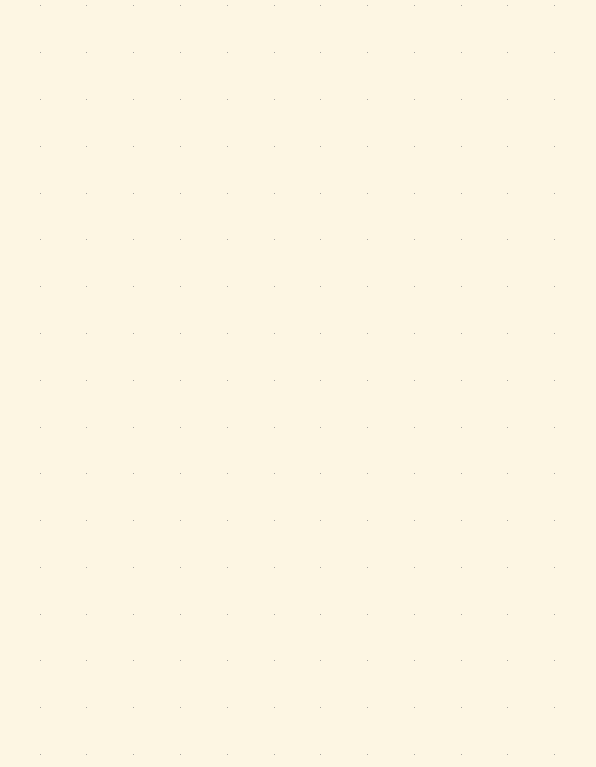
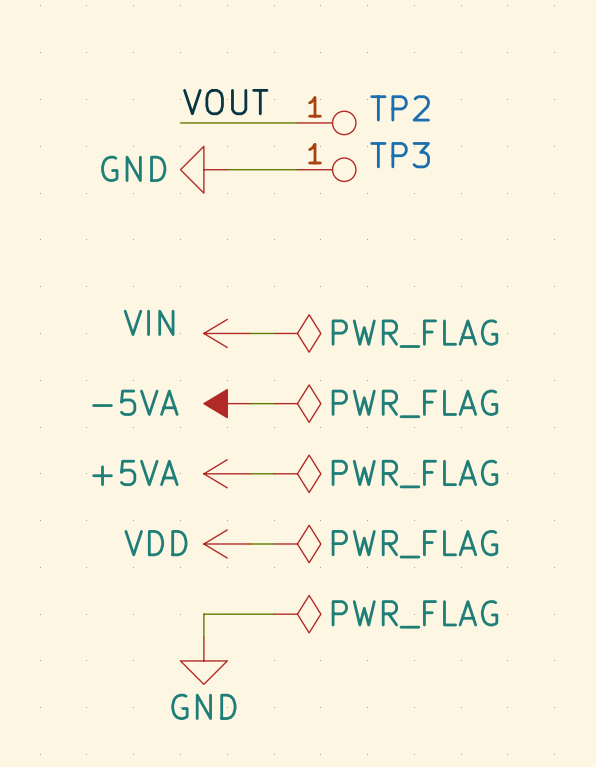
label: none -> VOUT (225, 102)
wire: none -> (180, 122) (297, 122)
TP2: none -> (326, 122)
power symbol: none -> GND (203, 169)
wire: none -> (227, 169) (297, 169)
TP3: none -> (326, 169)
power symbol: none -> VIN (227, 333)
wire: none -> (250, 333) (274, 333)
power symbol: none -> PWR_FLAG (297, 333)
power symbol: none -> -5VA (227, 403)
wire: none -> (250, 403) (274, 403)
power symbol: none -> PWR_FLAG (297, 403)
power symbol: none -> +5VA (227, 473)
wire: none -> (250, 473) (274, 473)
power symbol: none -> PWR_FLAG (297, 473)
power symbol: none -> VDD (227, 543)
wire: none -> (250, 543) (274, 543)
power symbol: none -> PWR_FLAG (297, 543)
wire: none -> (274, 614) (203, 614) (203, 637)
power symbol: none -> PWR_FLAG (297, 614)
power symbol: none -> GND (203, 660)

